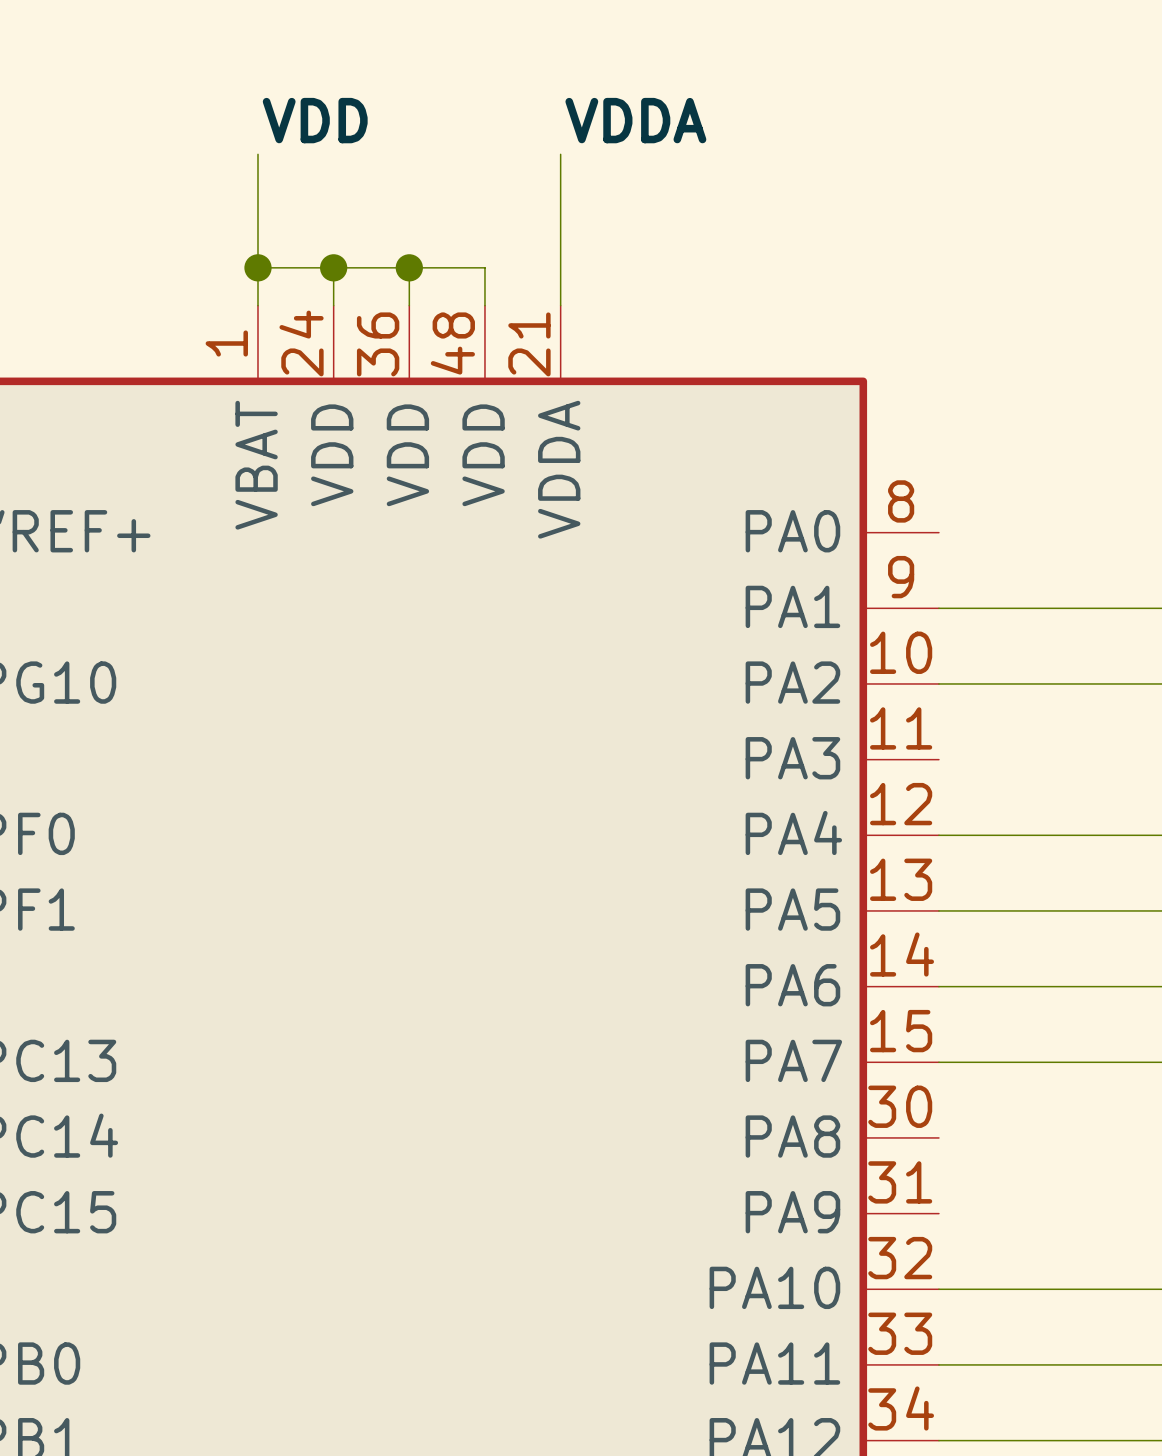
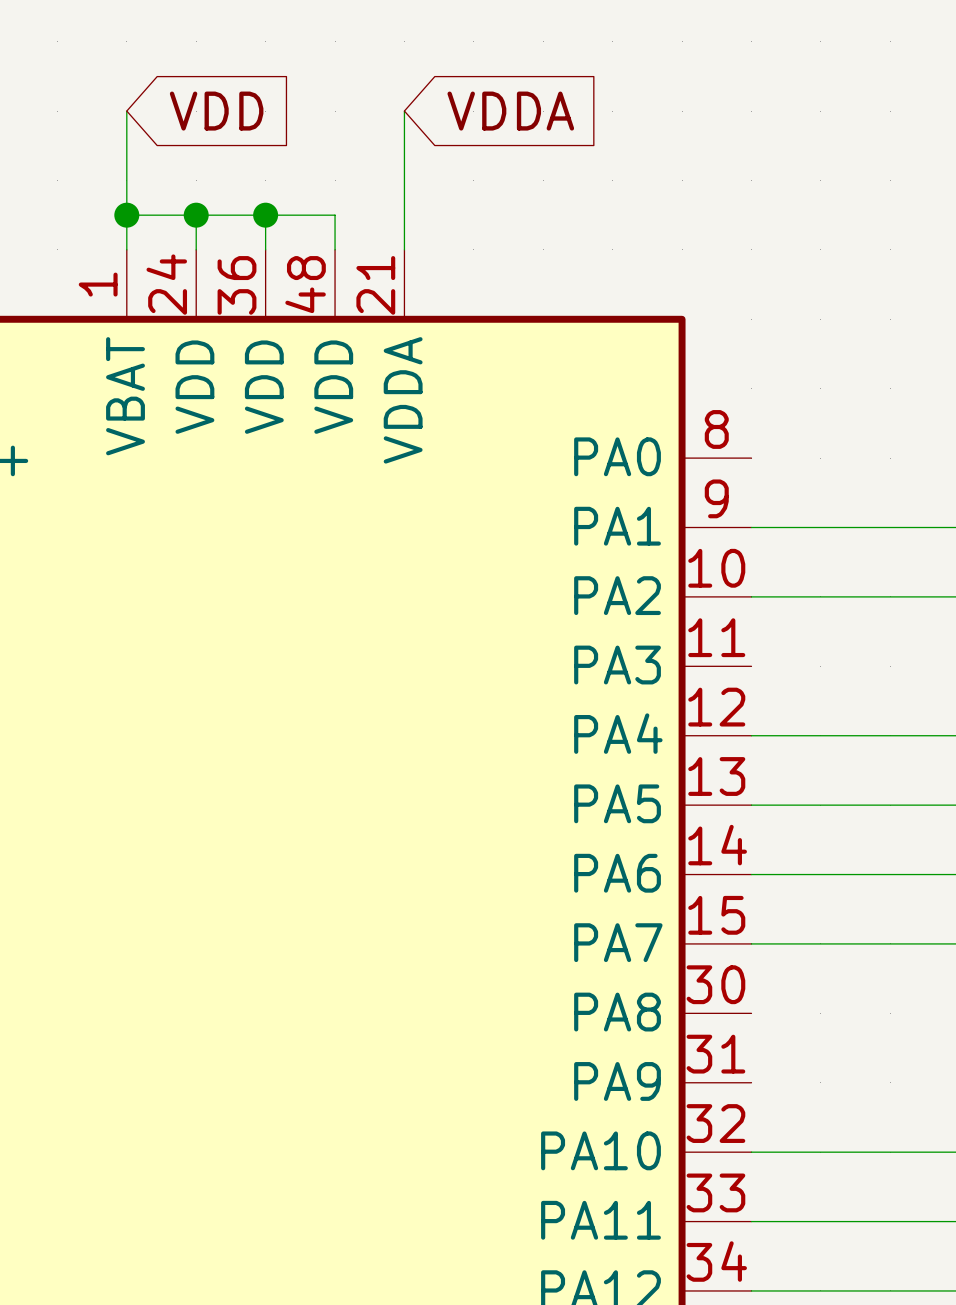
label: VDD (315, 120) -> none
label: VDDA (635, 120) -> none
global label: none -> VDD (216, 111)
global label: none -> VDDA (510, 111)

